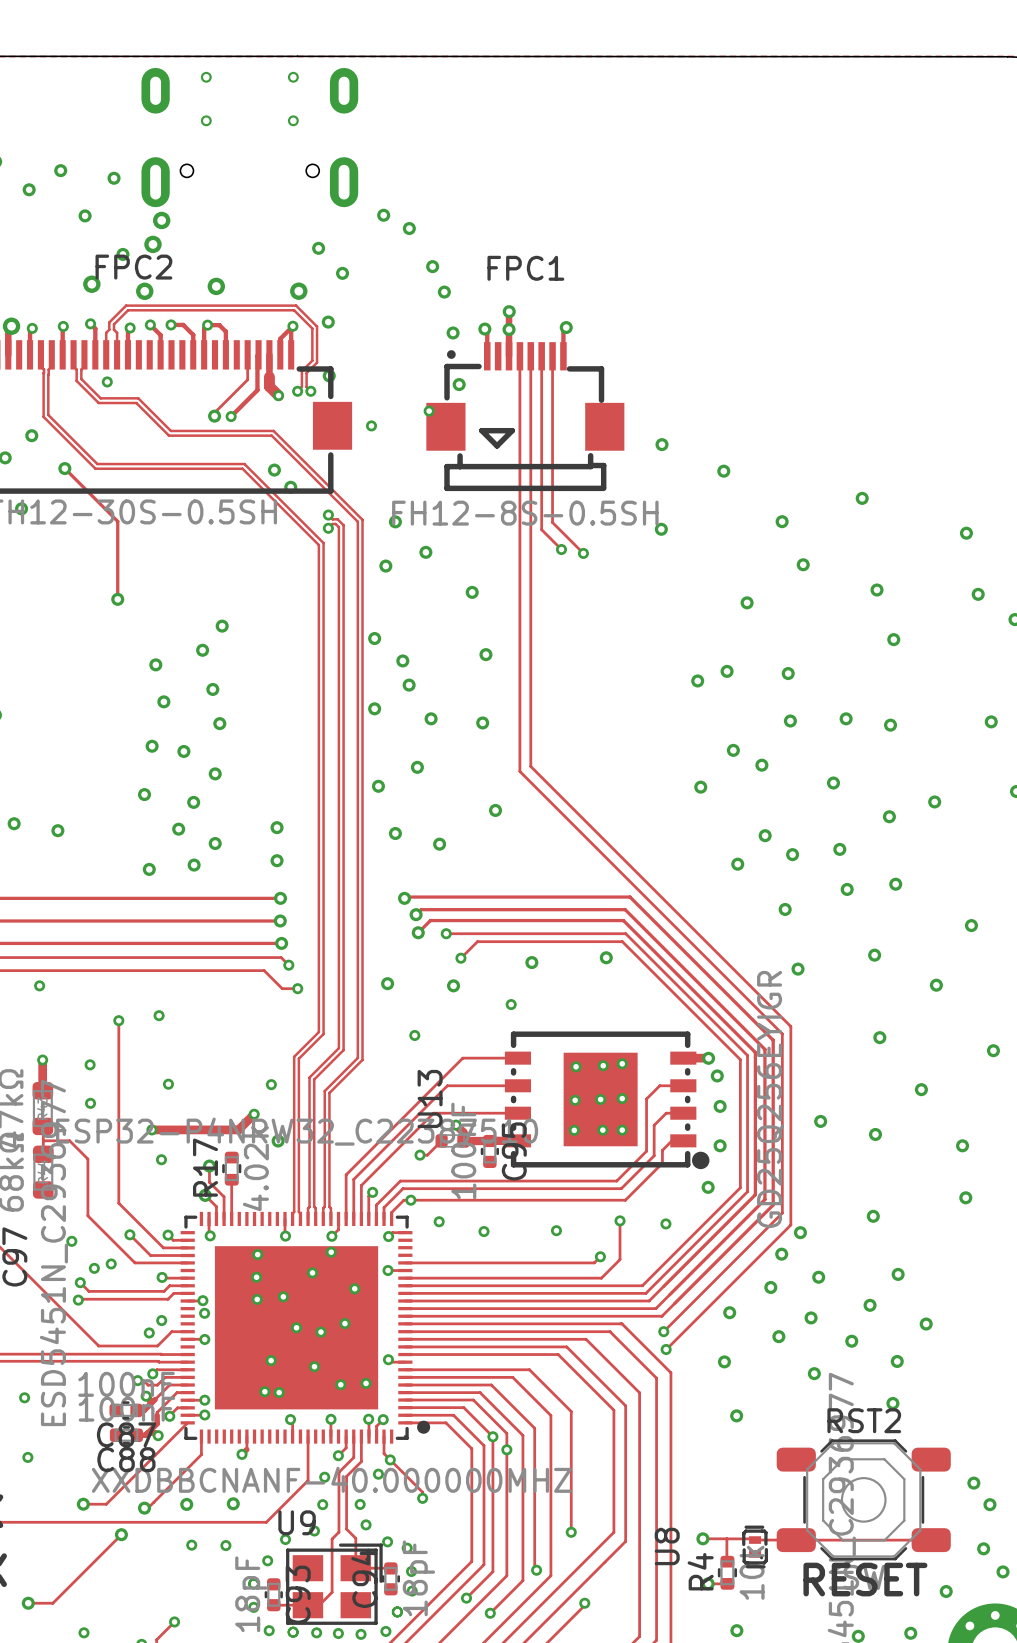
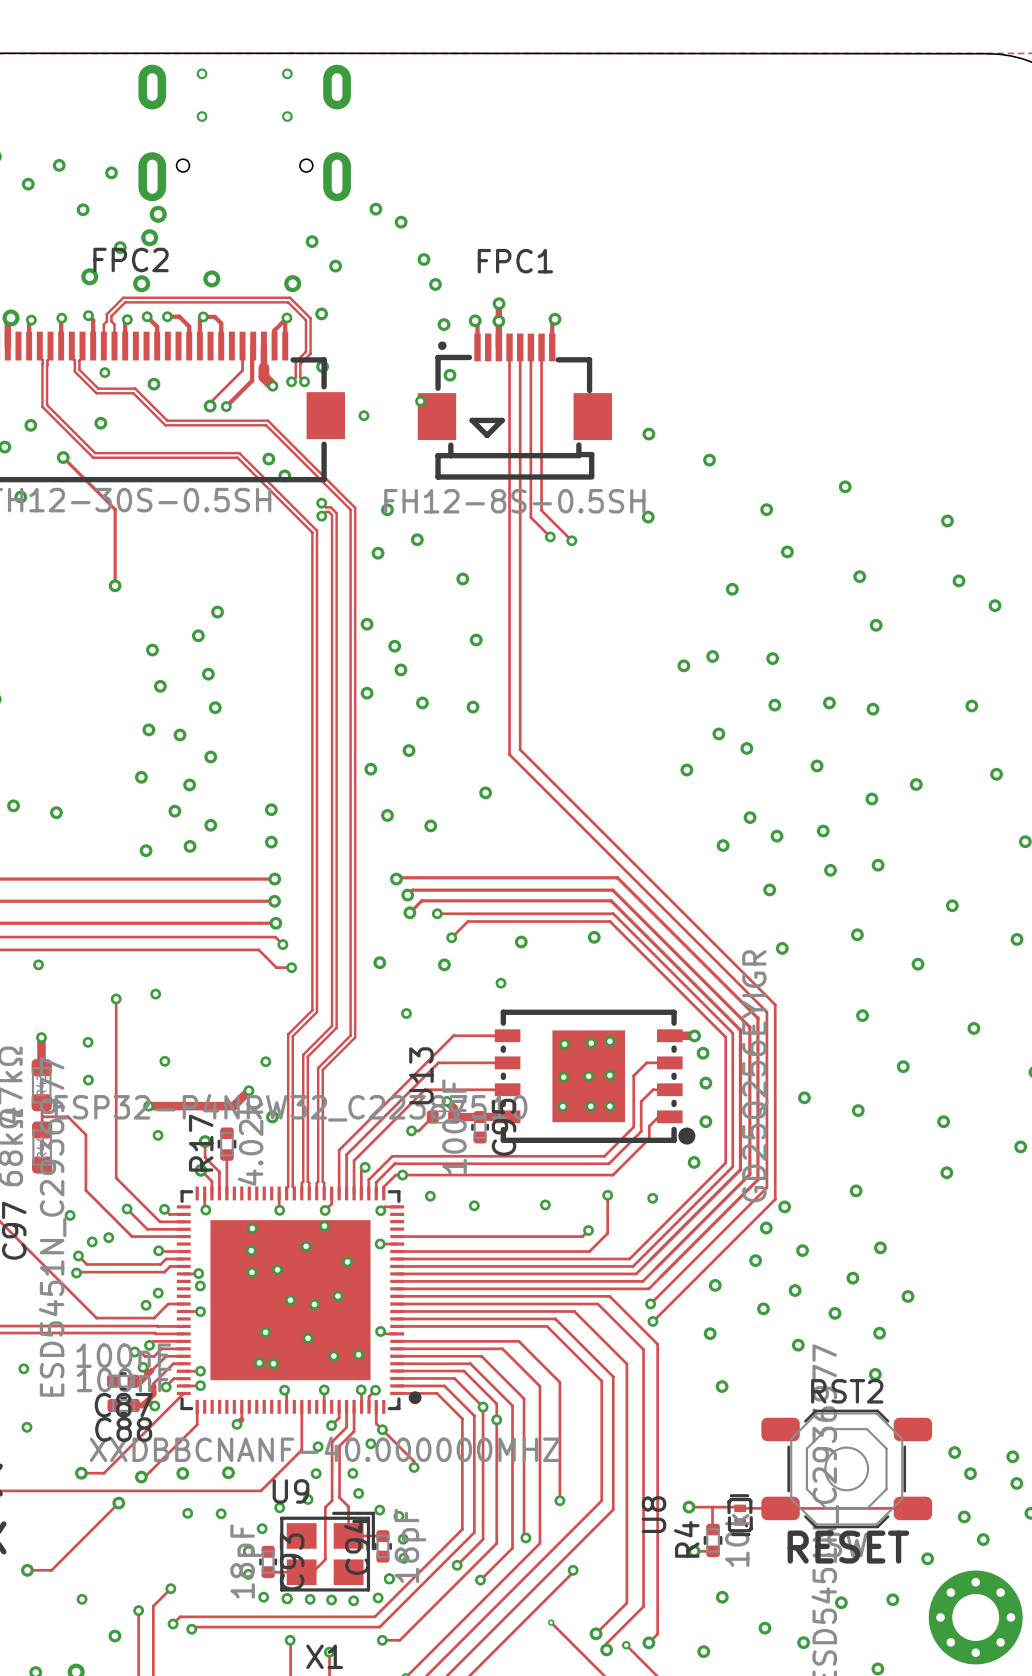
via: none -> (153, 384)
via: none -> (100, 423)

